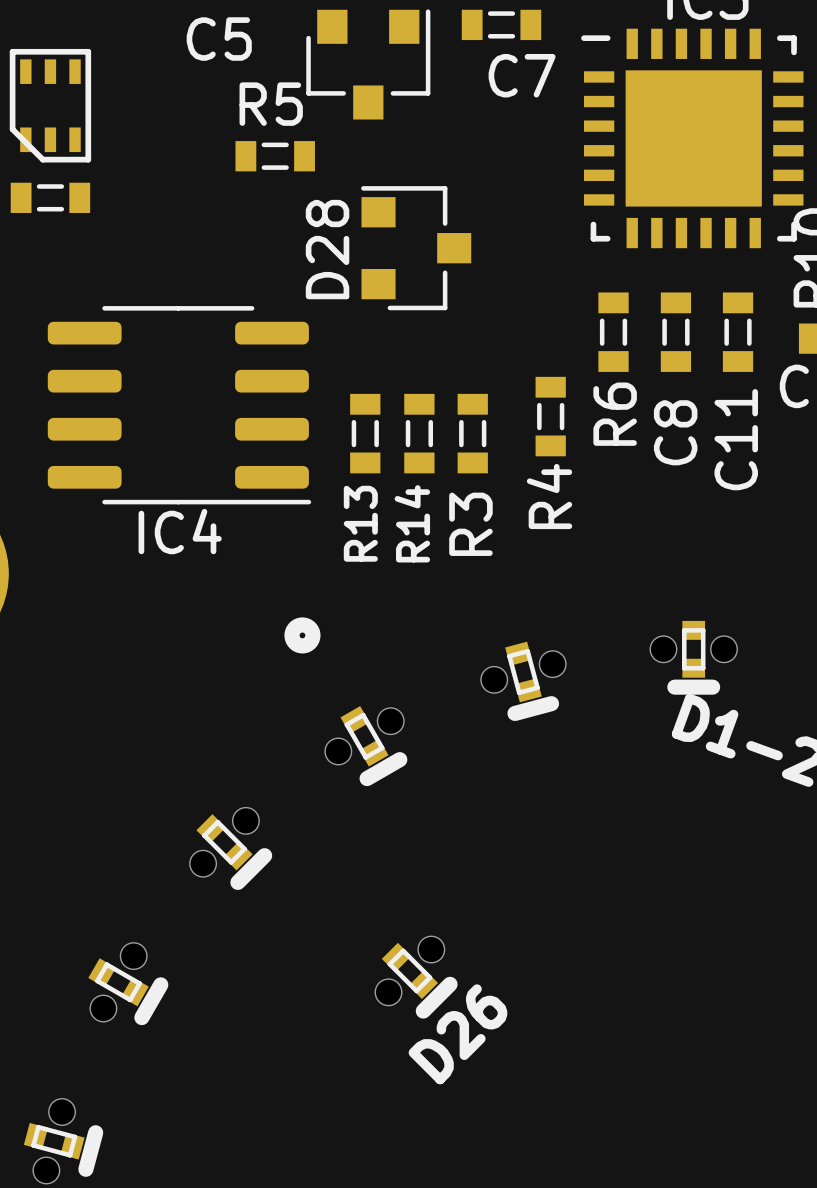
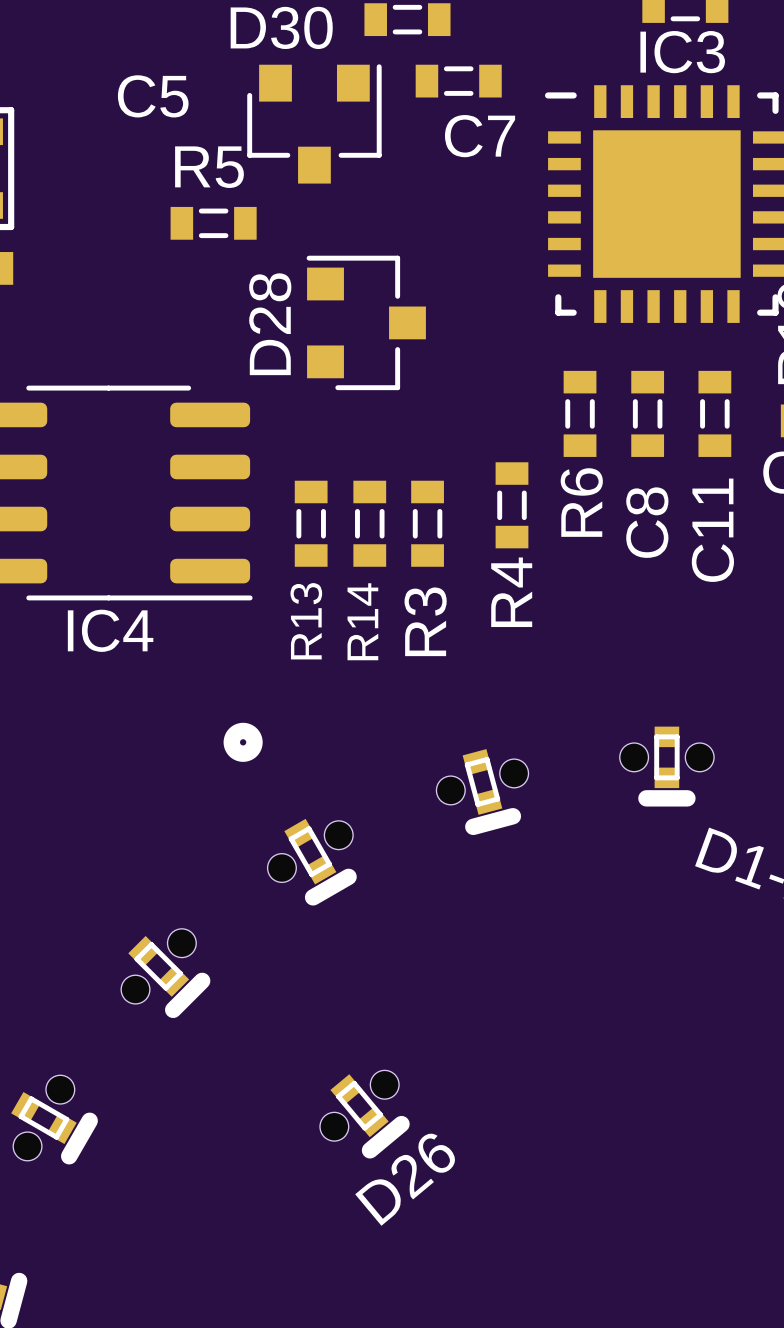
D26 rotation: 0° (416, 977) -> 5.2° clockwise (364, 1114)

